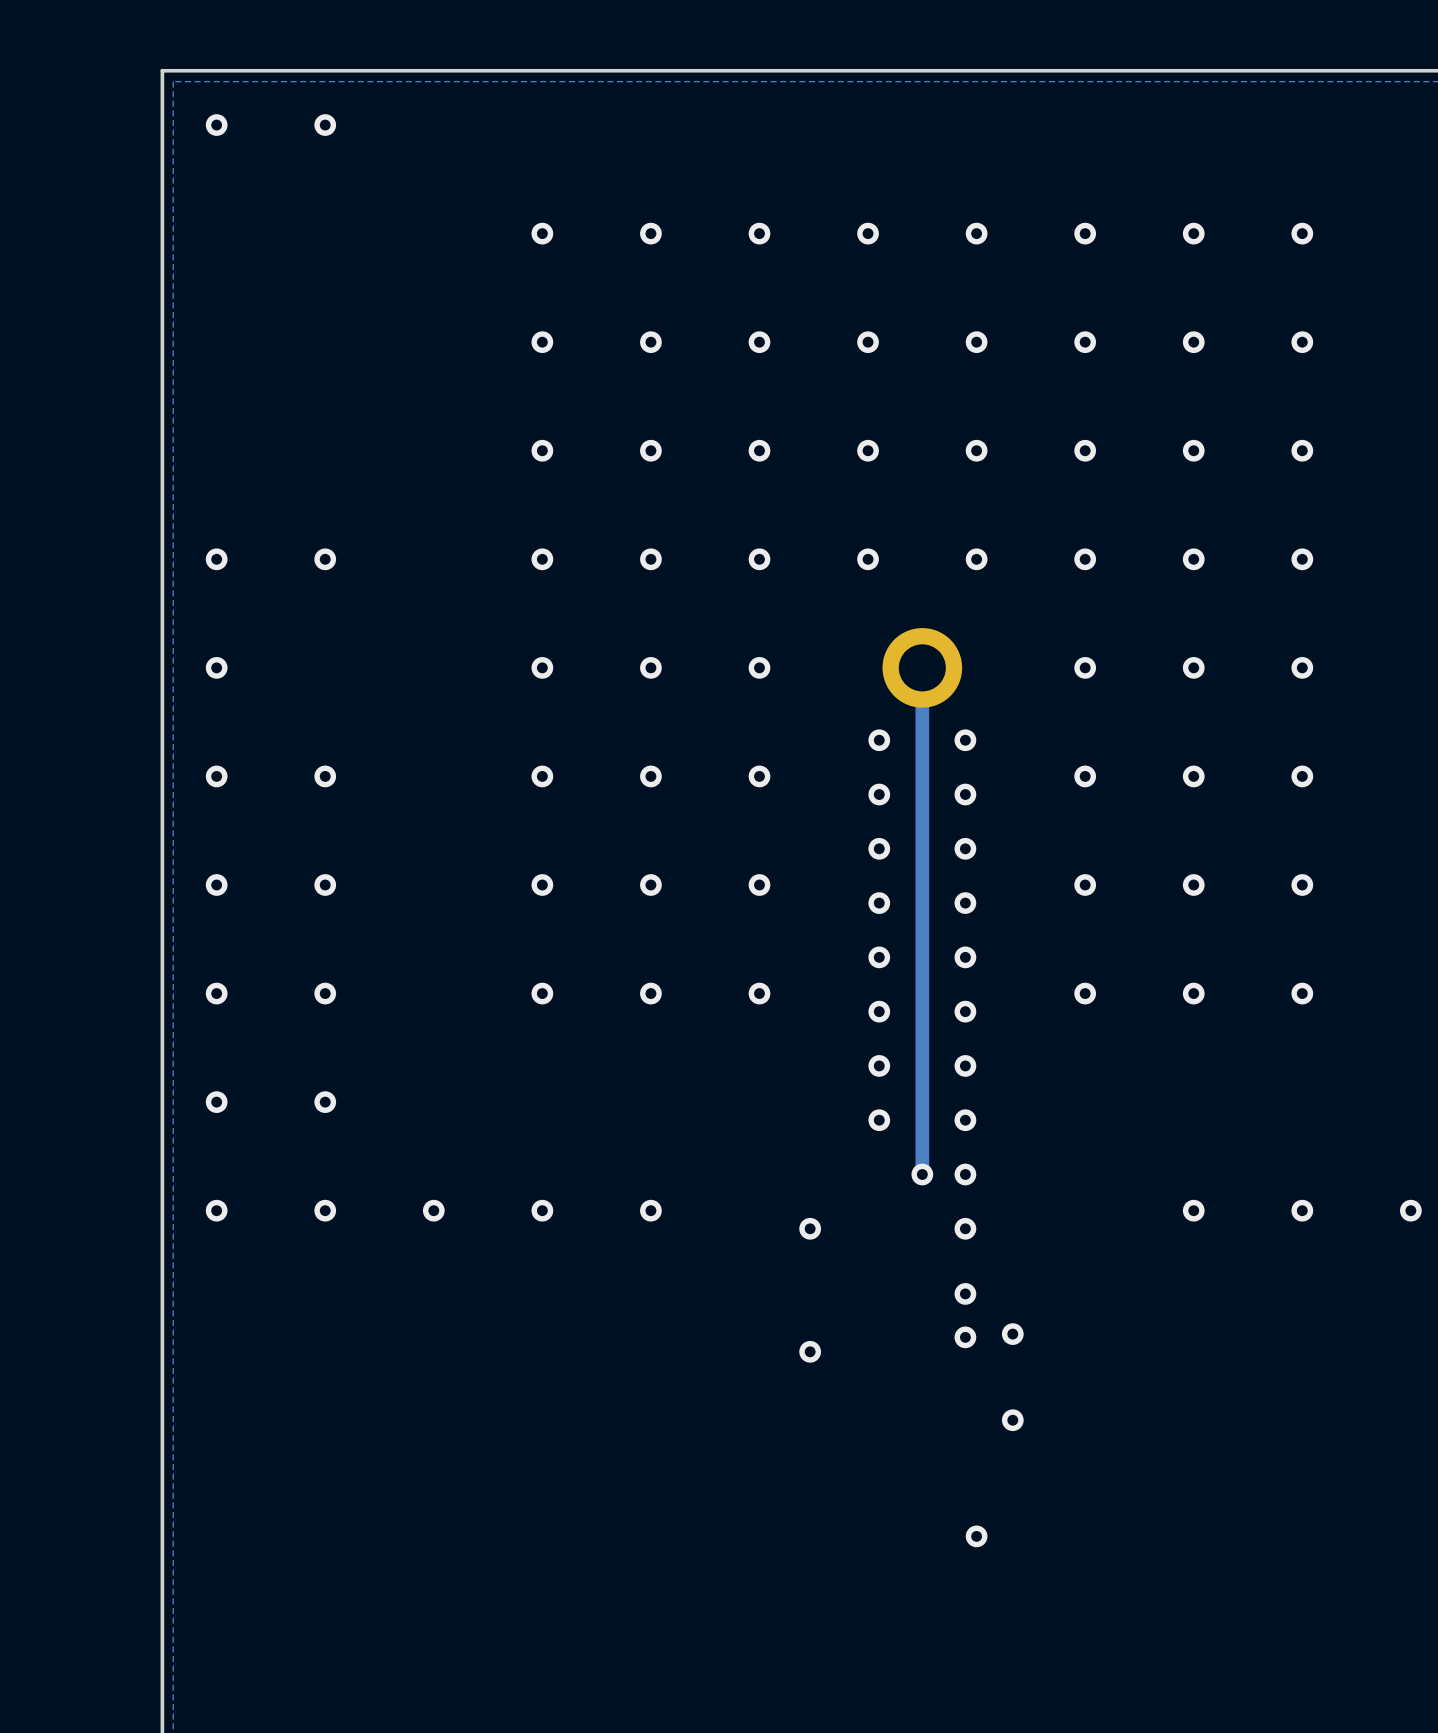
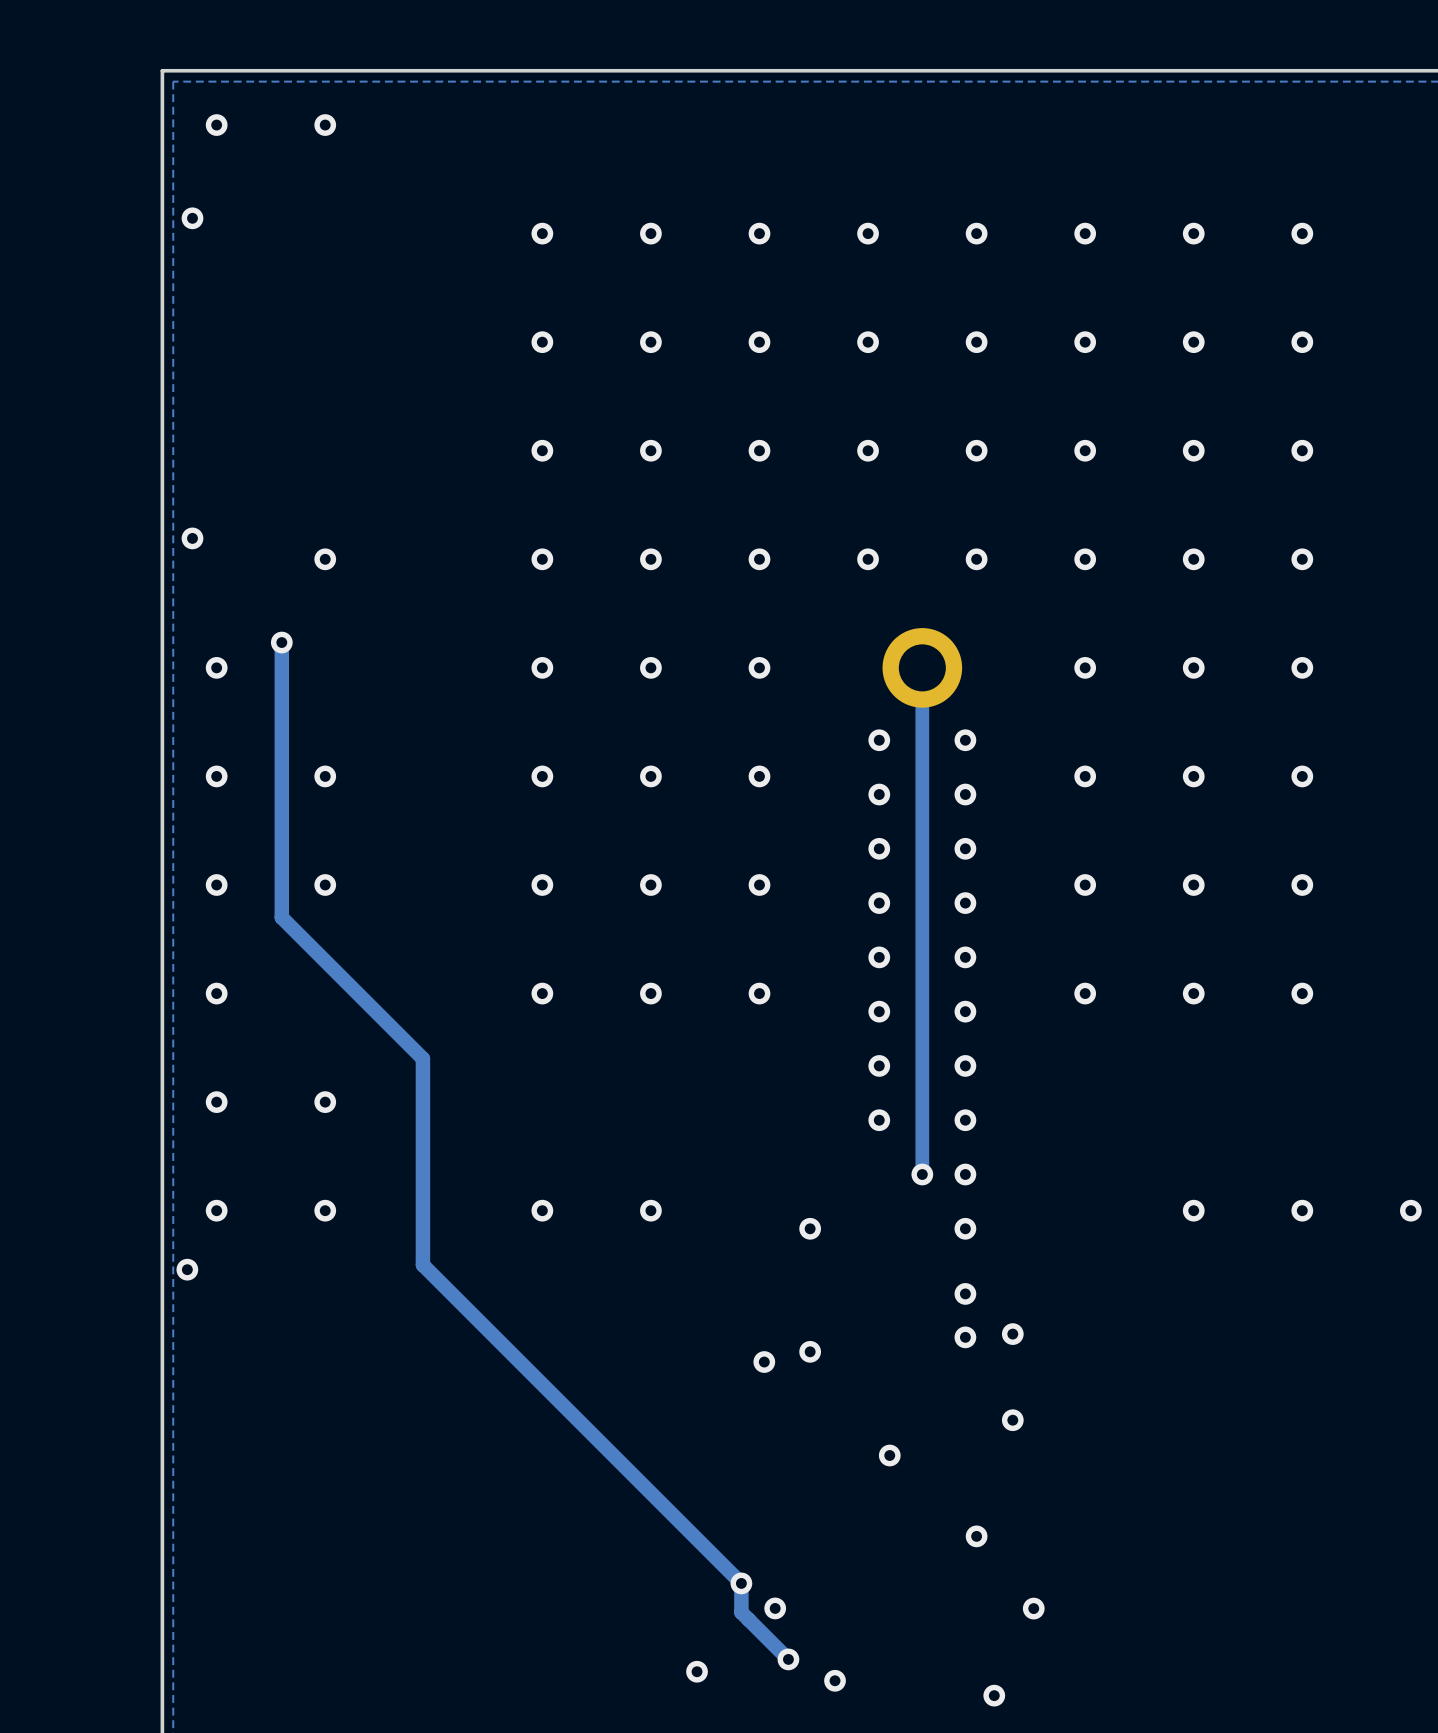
via: none -> (192, 218)
via position: (216, 559) -> (192, 538)
track: none -> (281, 642) (281, 917) (422, 1058) (422, 1264) (741, 1583) (741, 1612) (788, 1659)
via: none -> (281, 642)
via: (325, 993) -> none
via: (433, 1210) -> none
via: none -> (187, 1269)
via: none -> (764, 1362)
via: none -> (889, 1455)
via: none -> (741, 1583)
via: none -> (775, 1608)
via: none -> (1033, 1608)
via: none -> (788, 1659)
via: none -> (697, 1671)
via: none -> (835, 1680)
via: none -> (994, 1695)

